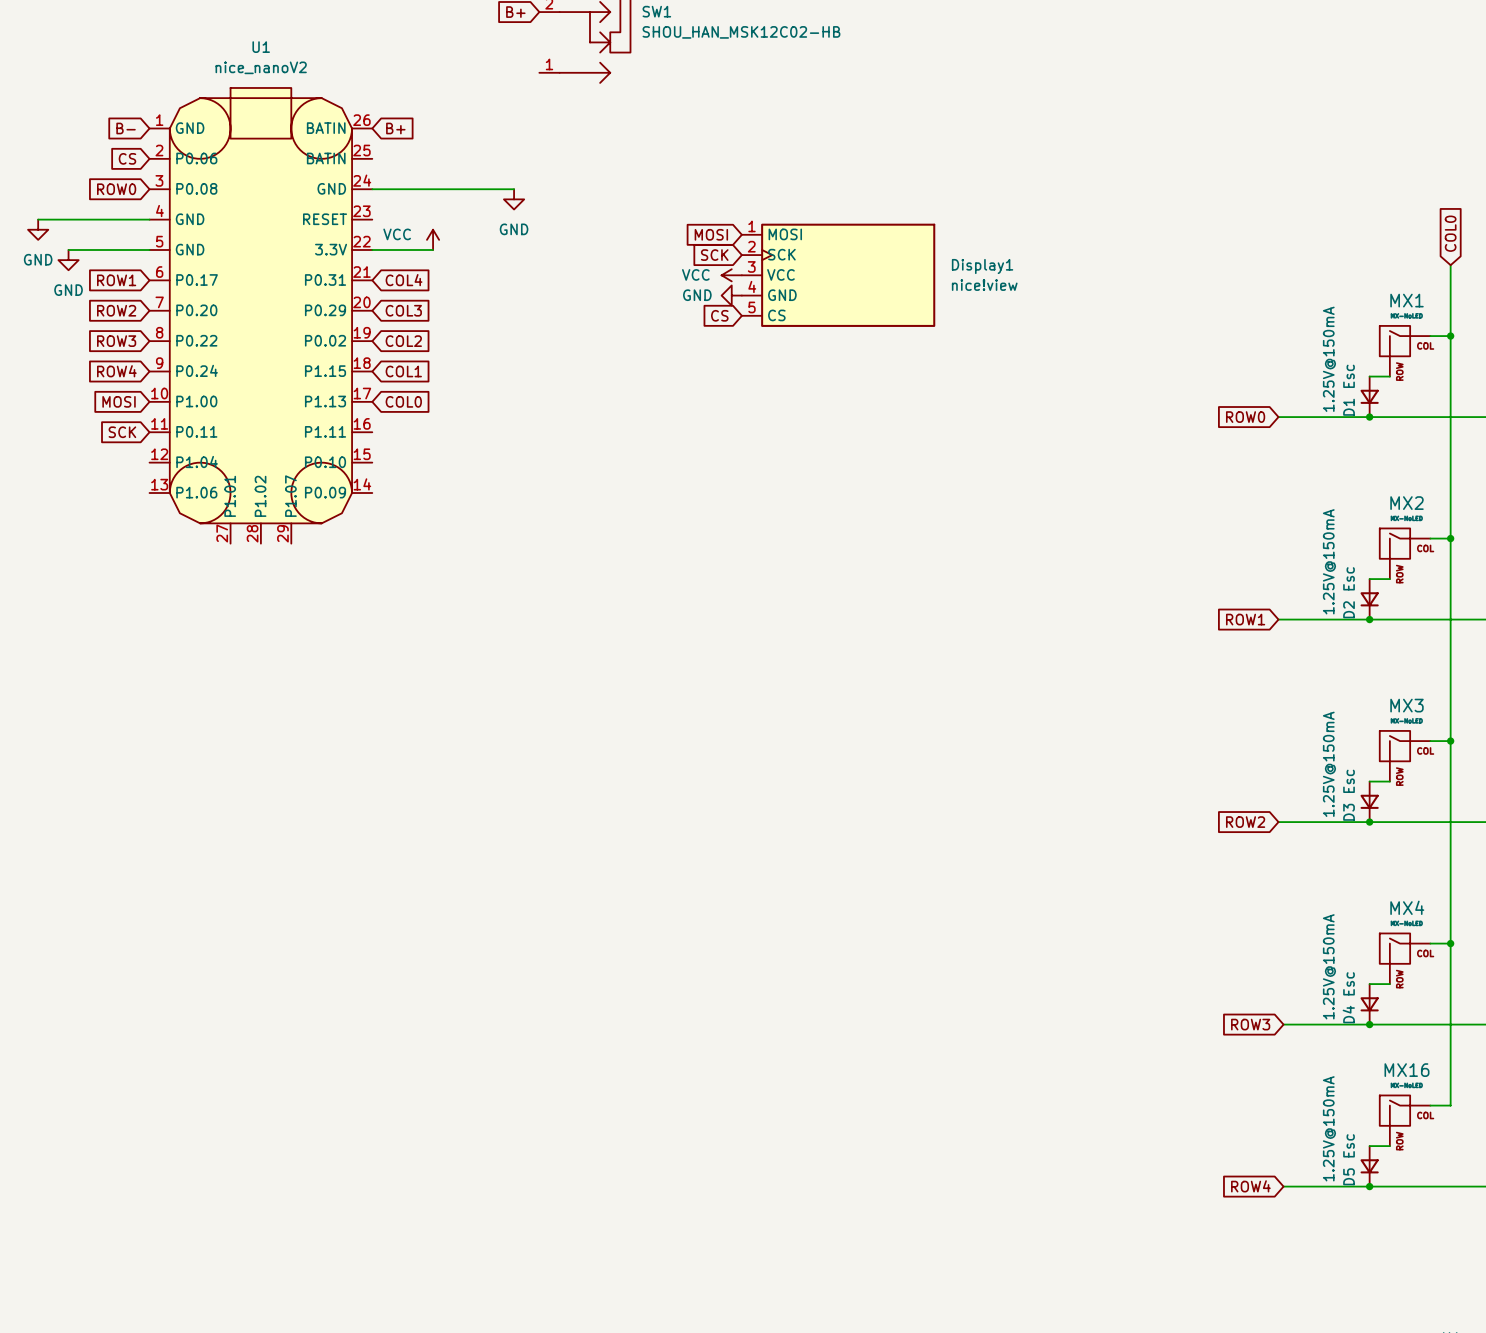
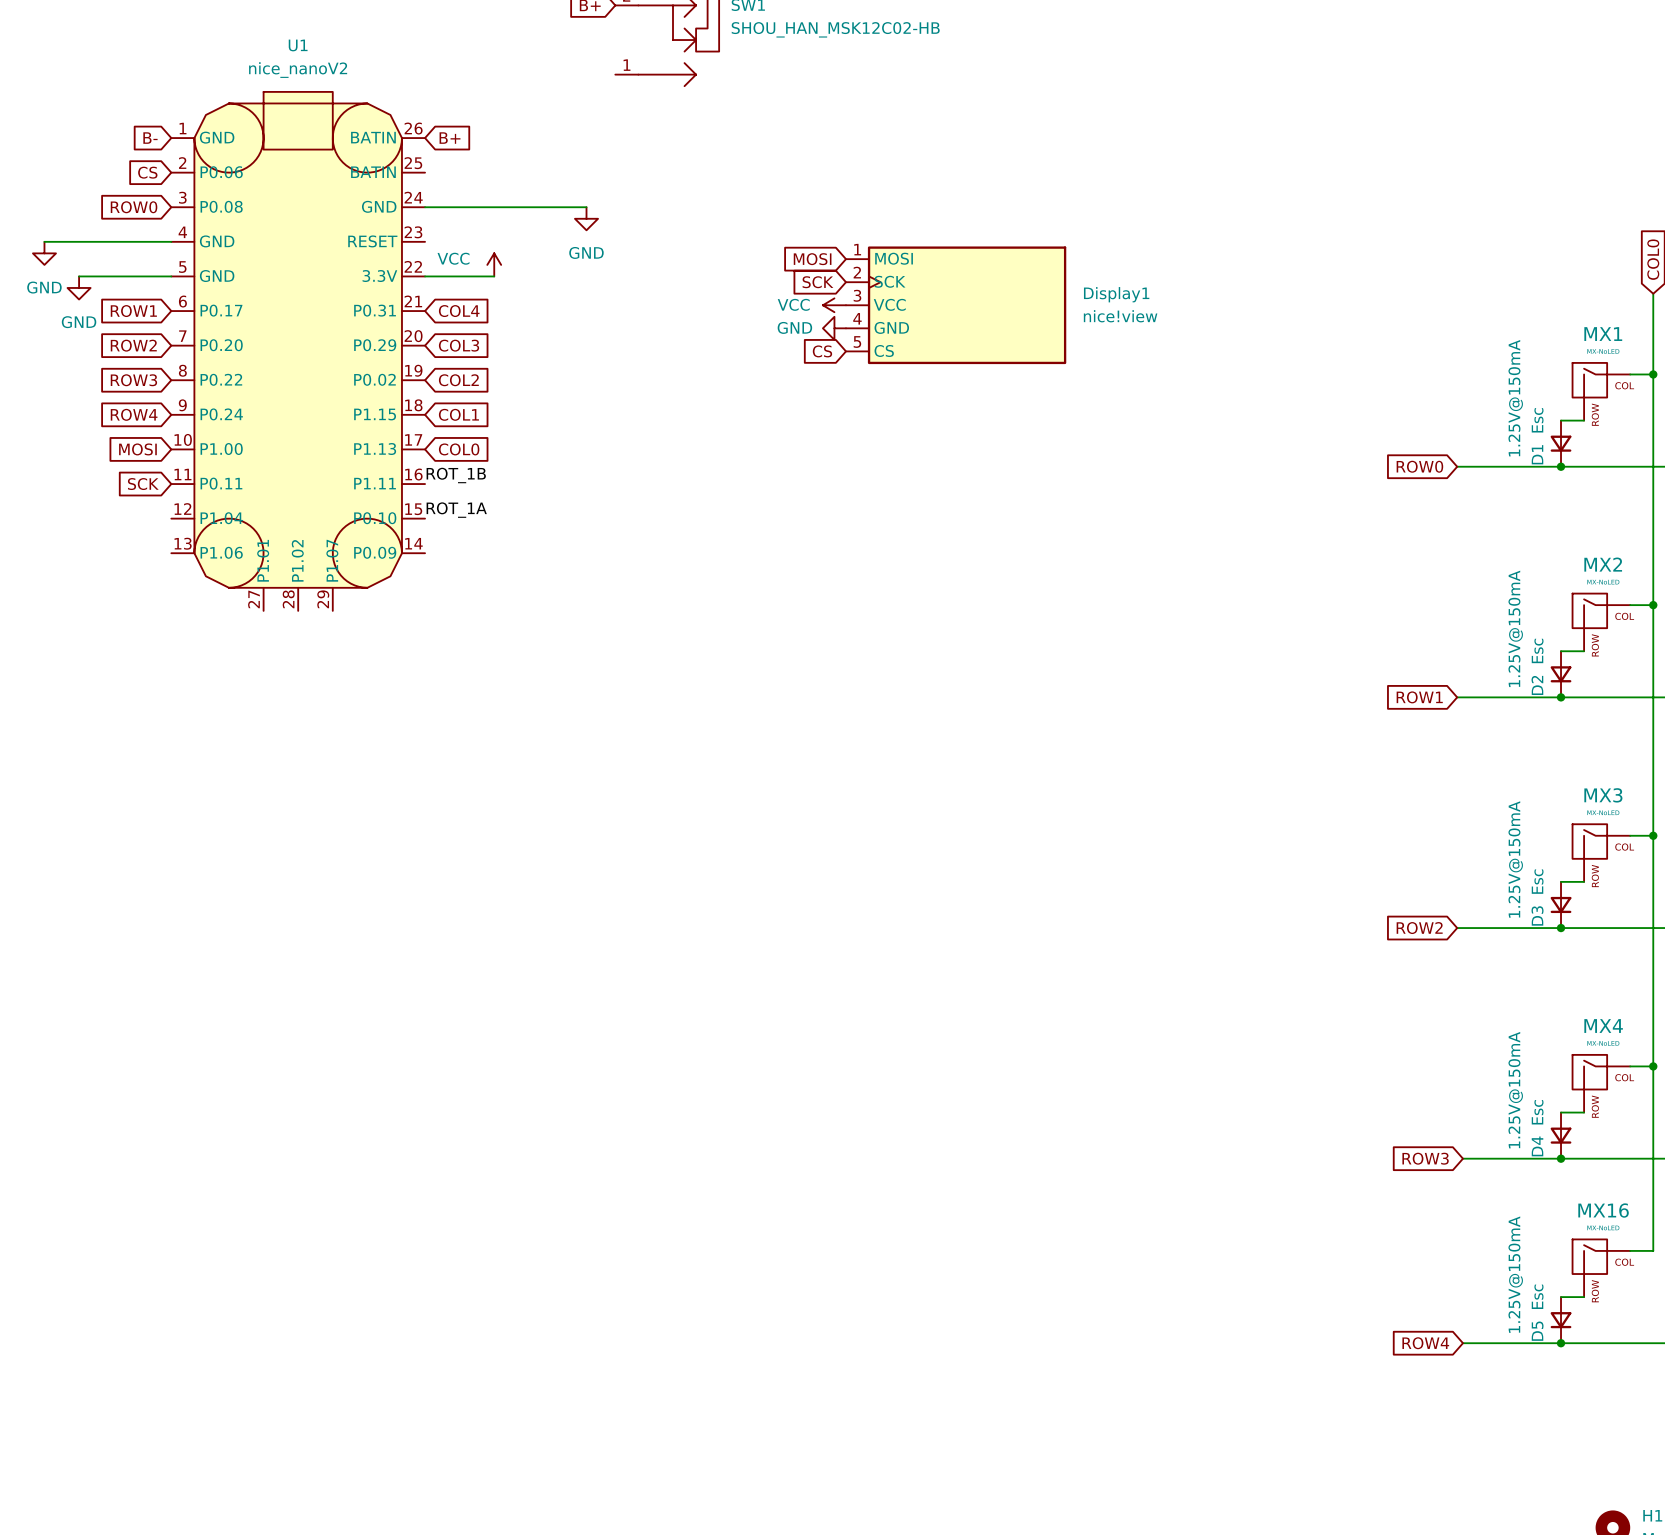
label: none -> ROT_1B (456, 475)
label: none -> ROT_1A (456, 510)

